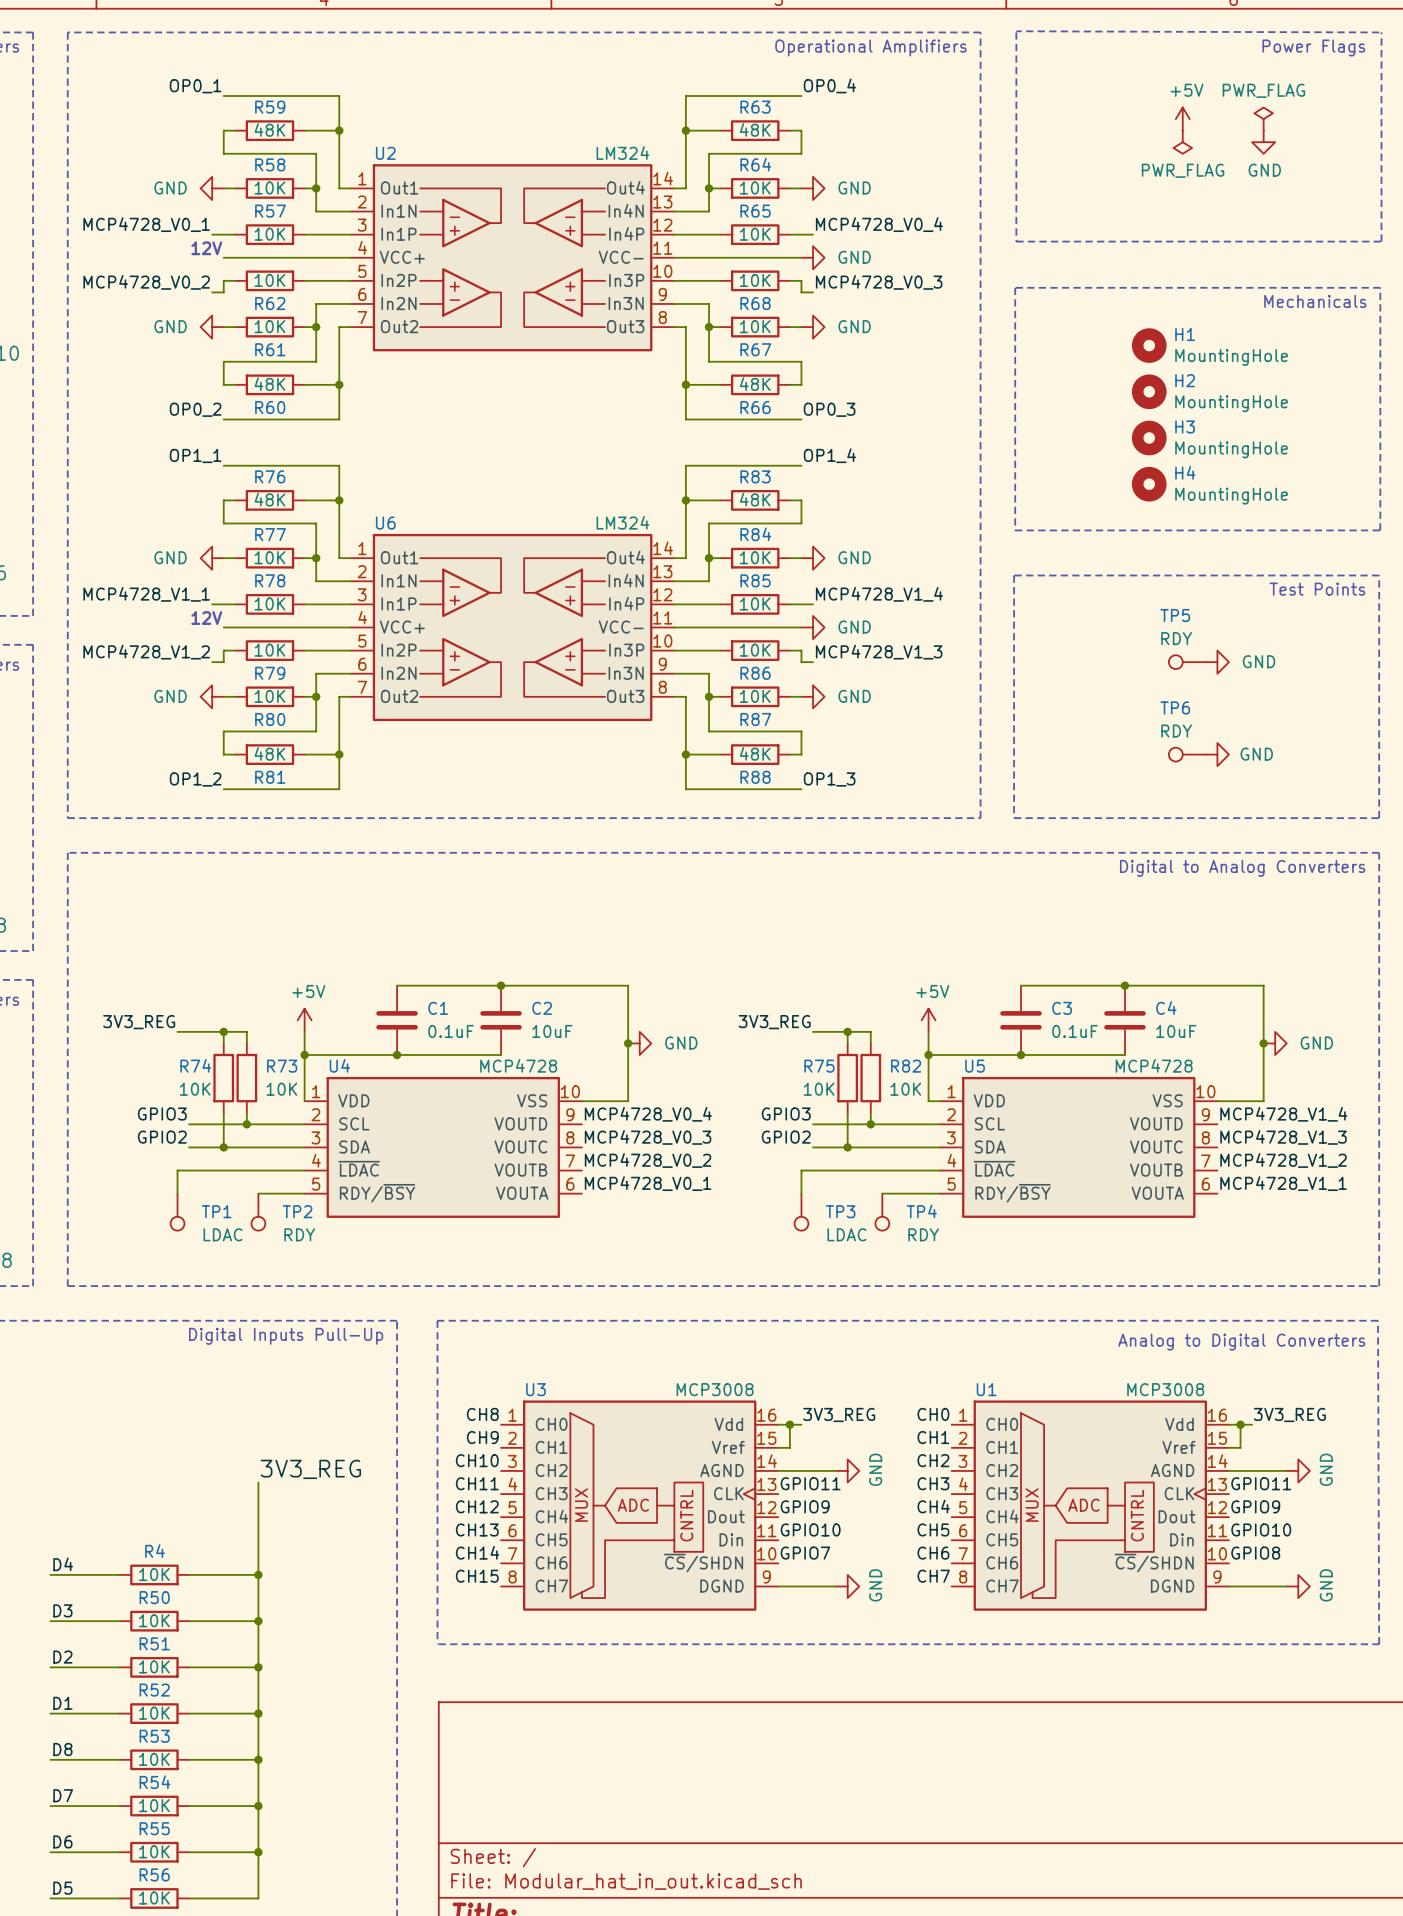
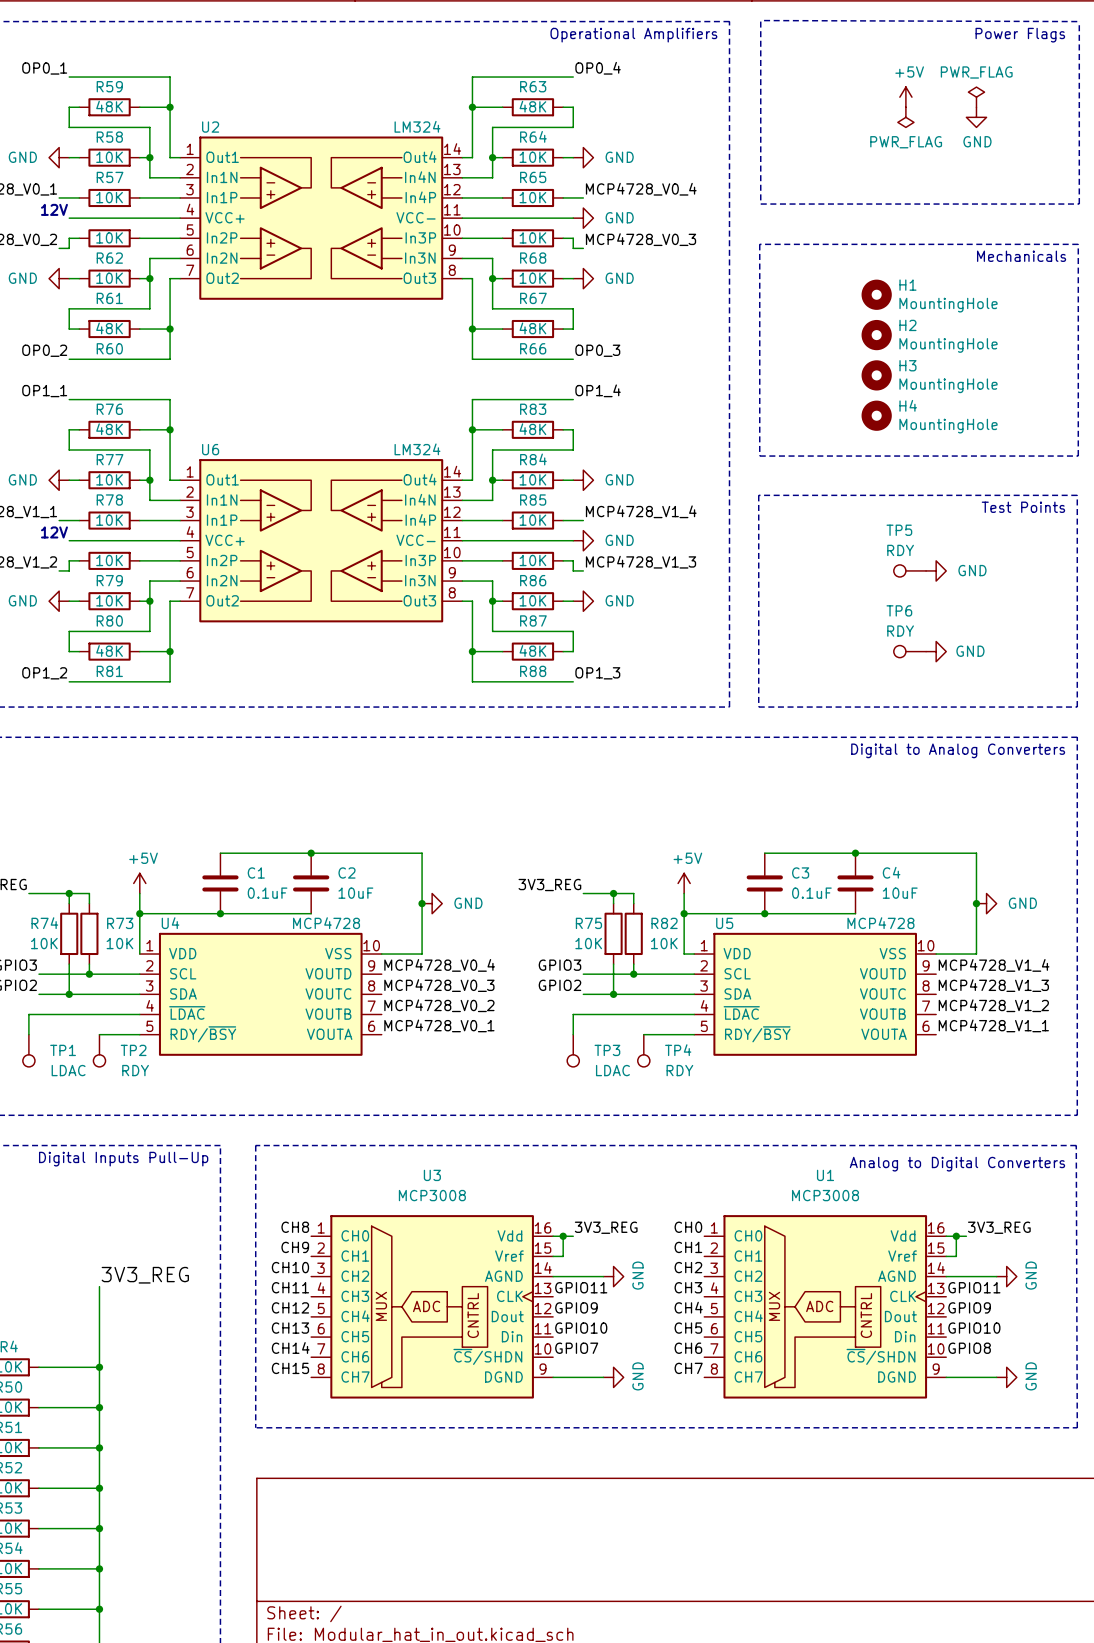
U3 name position: U3 (535, 1389) -> U3 (432, 1175)
U3 value position: MCP3008 (715, 1389) -> MCP3008 (432, 1195)
U1 name position: U1 (986, 1389) -> U1 (825, 1175)
U1 value position: MCP3008 (1165, 1389) -> MCP3008 (825, 1195)

